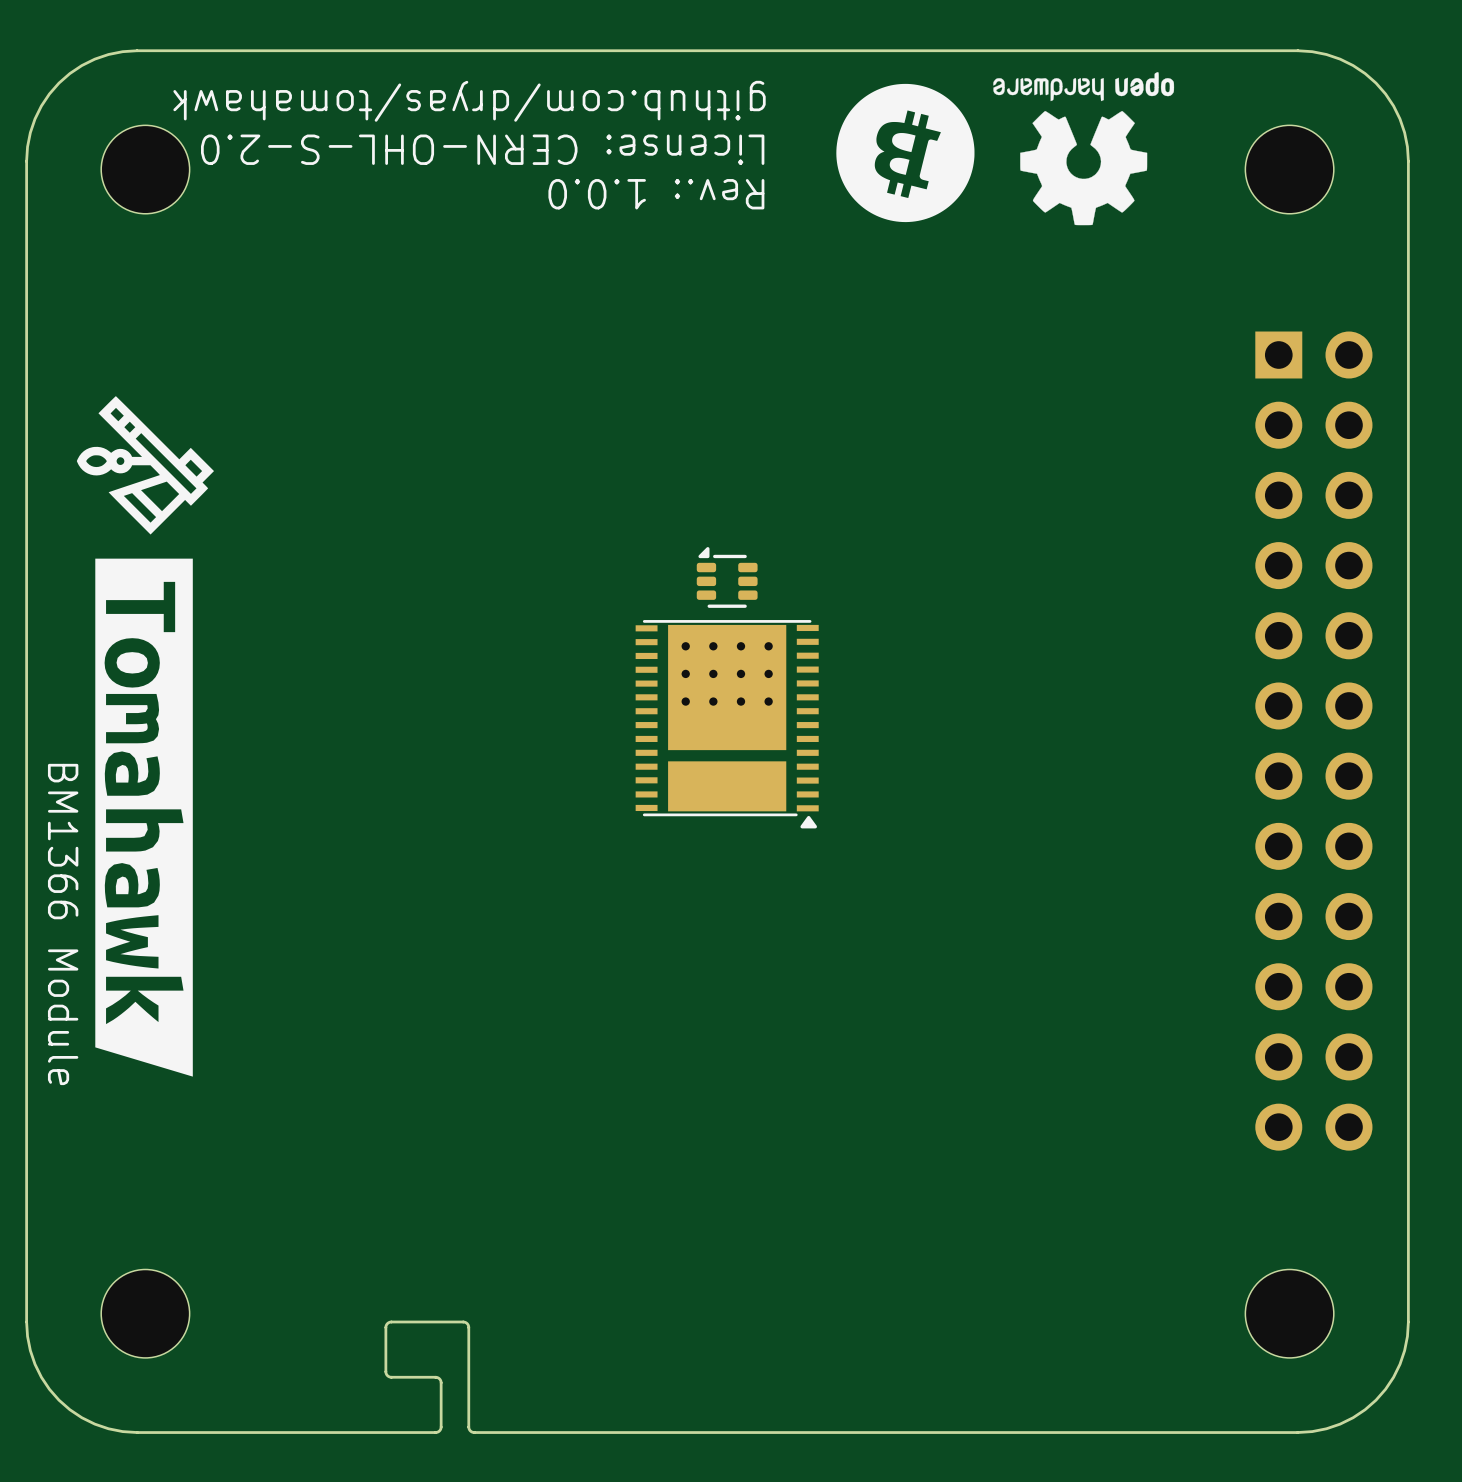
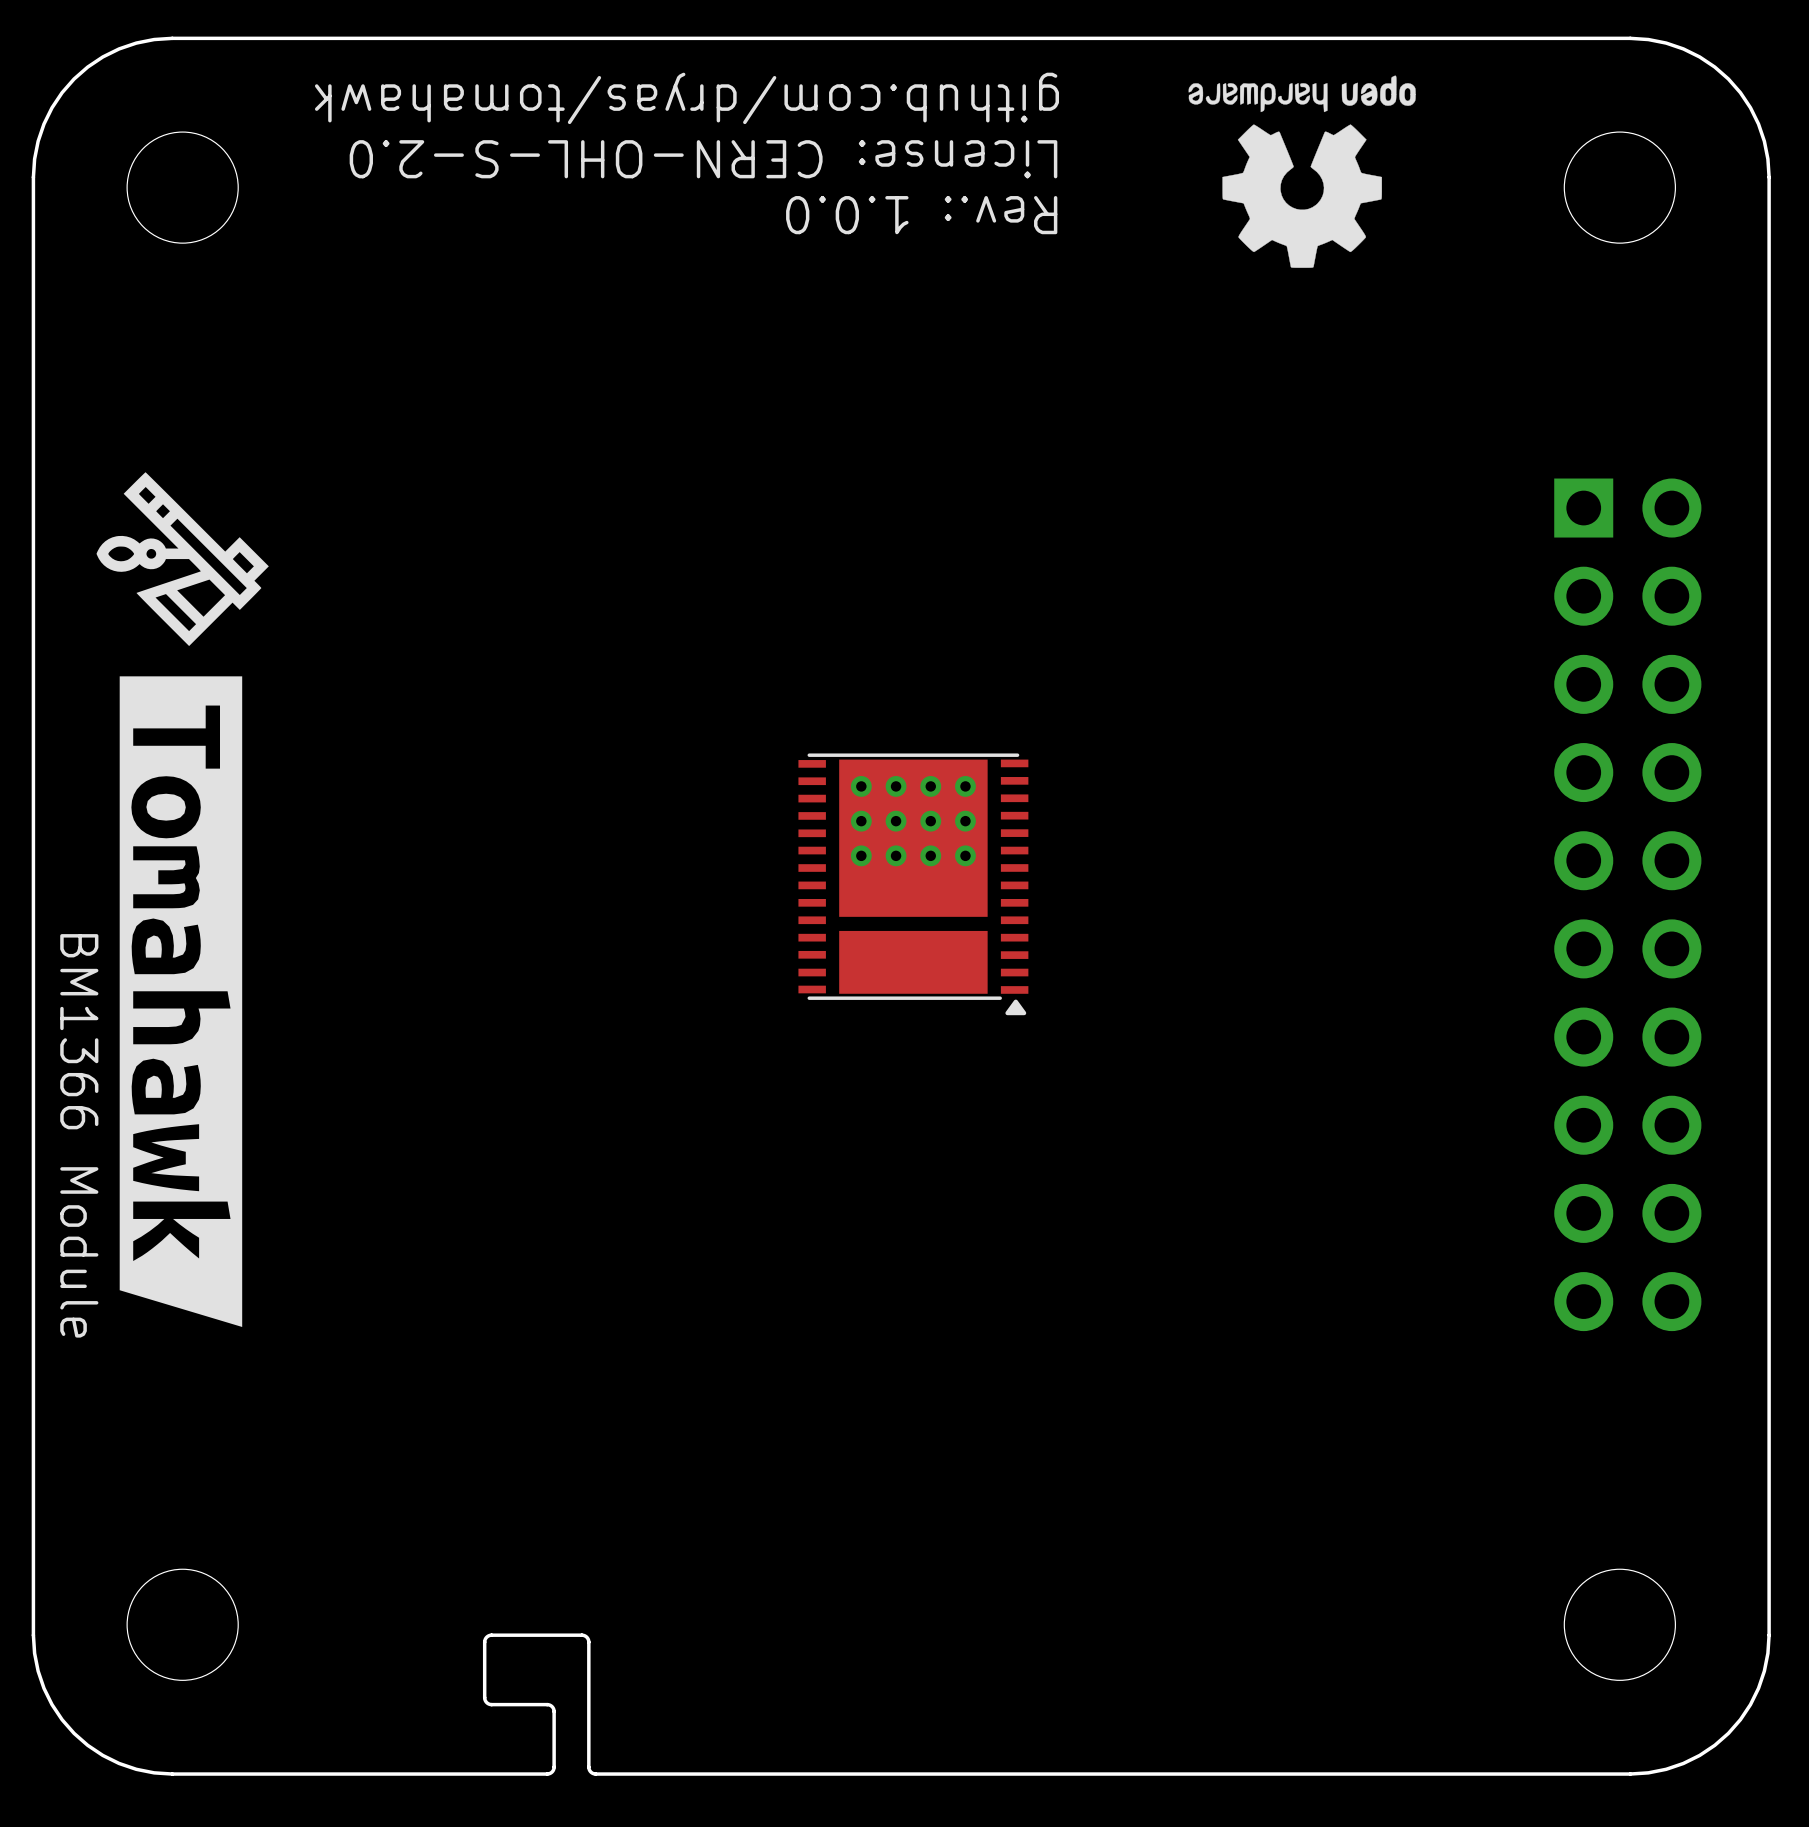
drawing: [836, 83, 975, 223] -> none
text position: github.com/dryas/tomahawk (469, 101) -> github.com/dryas/tomahawk (686, 98)
drawing position: (1083, 148) -> (1302, 171)
text position: License: CERN-OHL-S-2.0 (482, 149) -> License: CERN-OHL-S-2.0 (703, 159)
text position: Rev.: 1.0.0 (656, 194) -> Rev.: 1.0.0 (921, 215)
part footprint: [1255, 331, 1373, 1151] -> [1554, 478, 1702, 1332]
part: (727, 577) -> none

